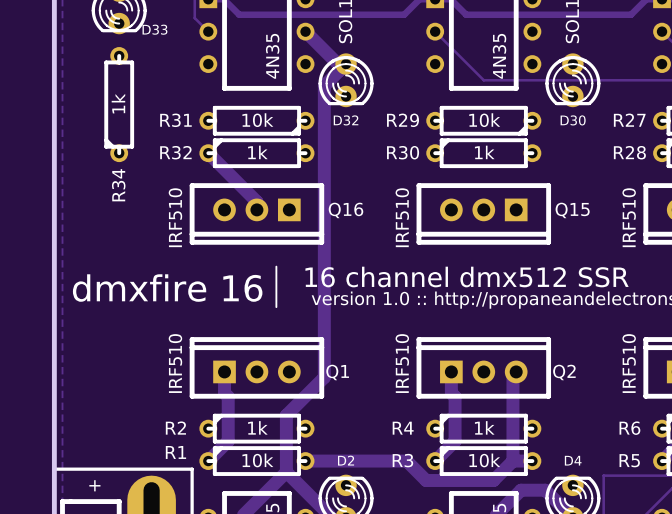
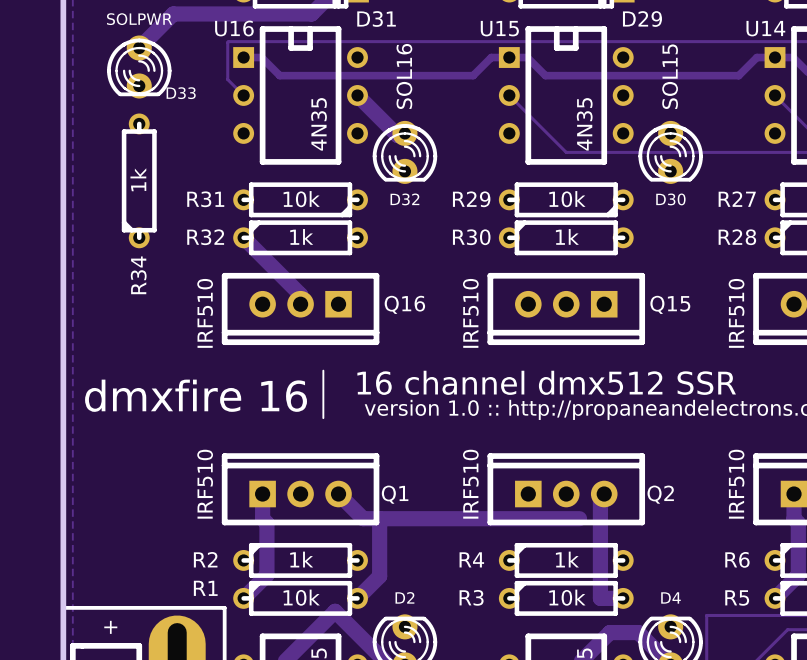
track: (339, 65) (339, 70) (324, 85) (324, 377) (286, 415) (286, 472) -> none
track: none -> (338, 494) (363, 518) (579, 518)
track: (451, 371) (451, 393) (455, 396) (455, 441) (435, 461) -> none
track: (305, 461) (406, 461) (426, 480) (493, 480) (512, 461) -> (357, 598) (379, 576) (379, 518)

